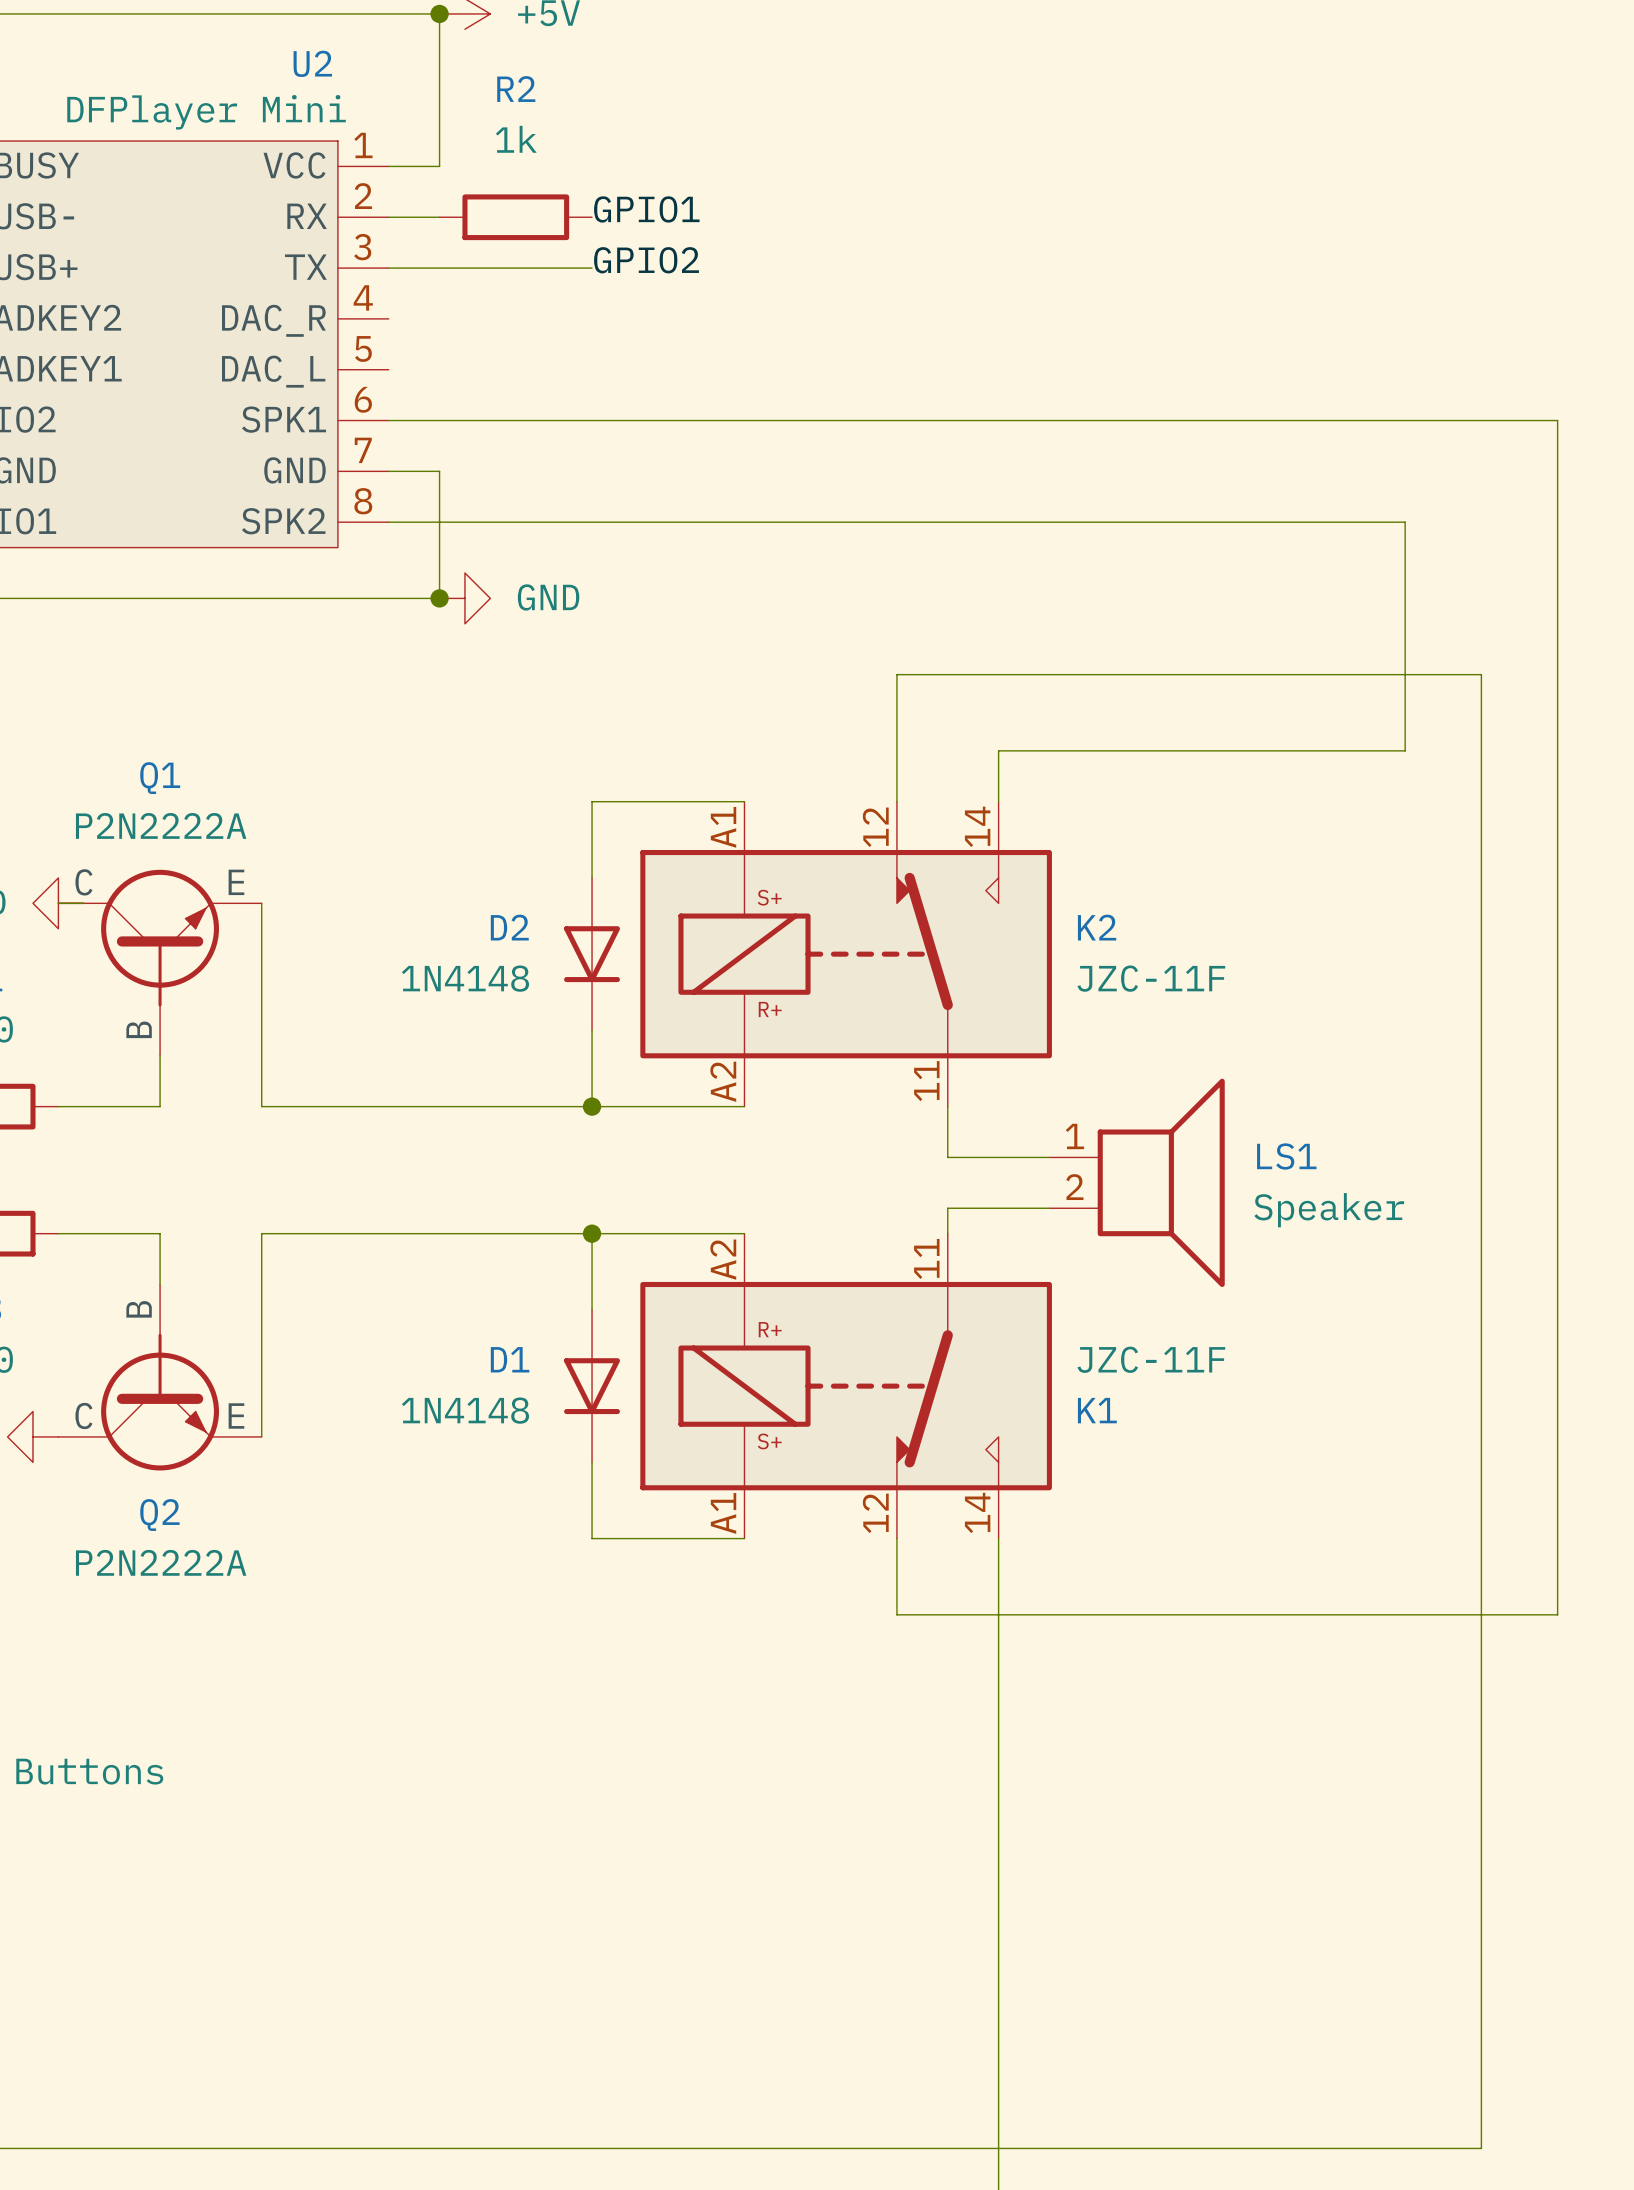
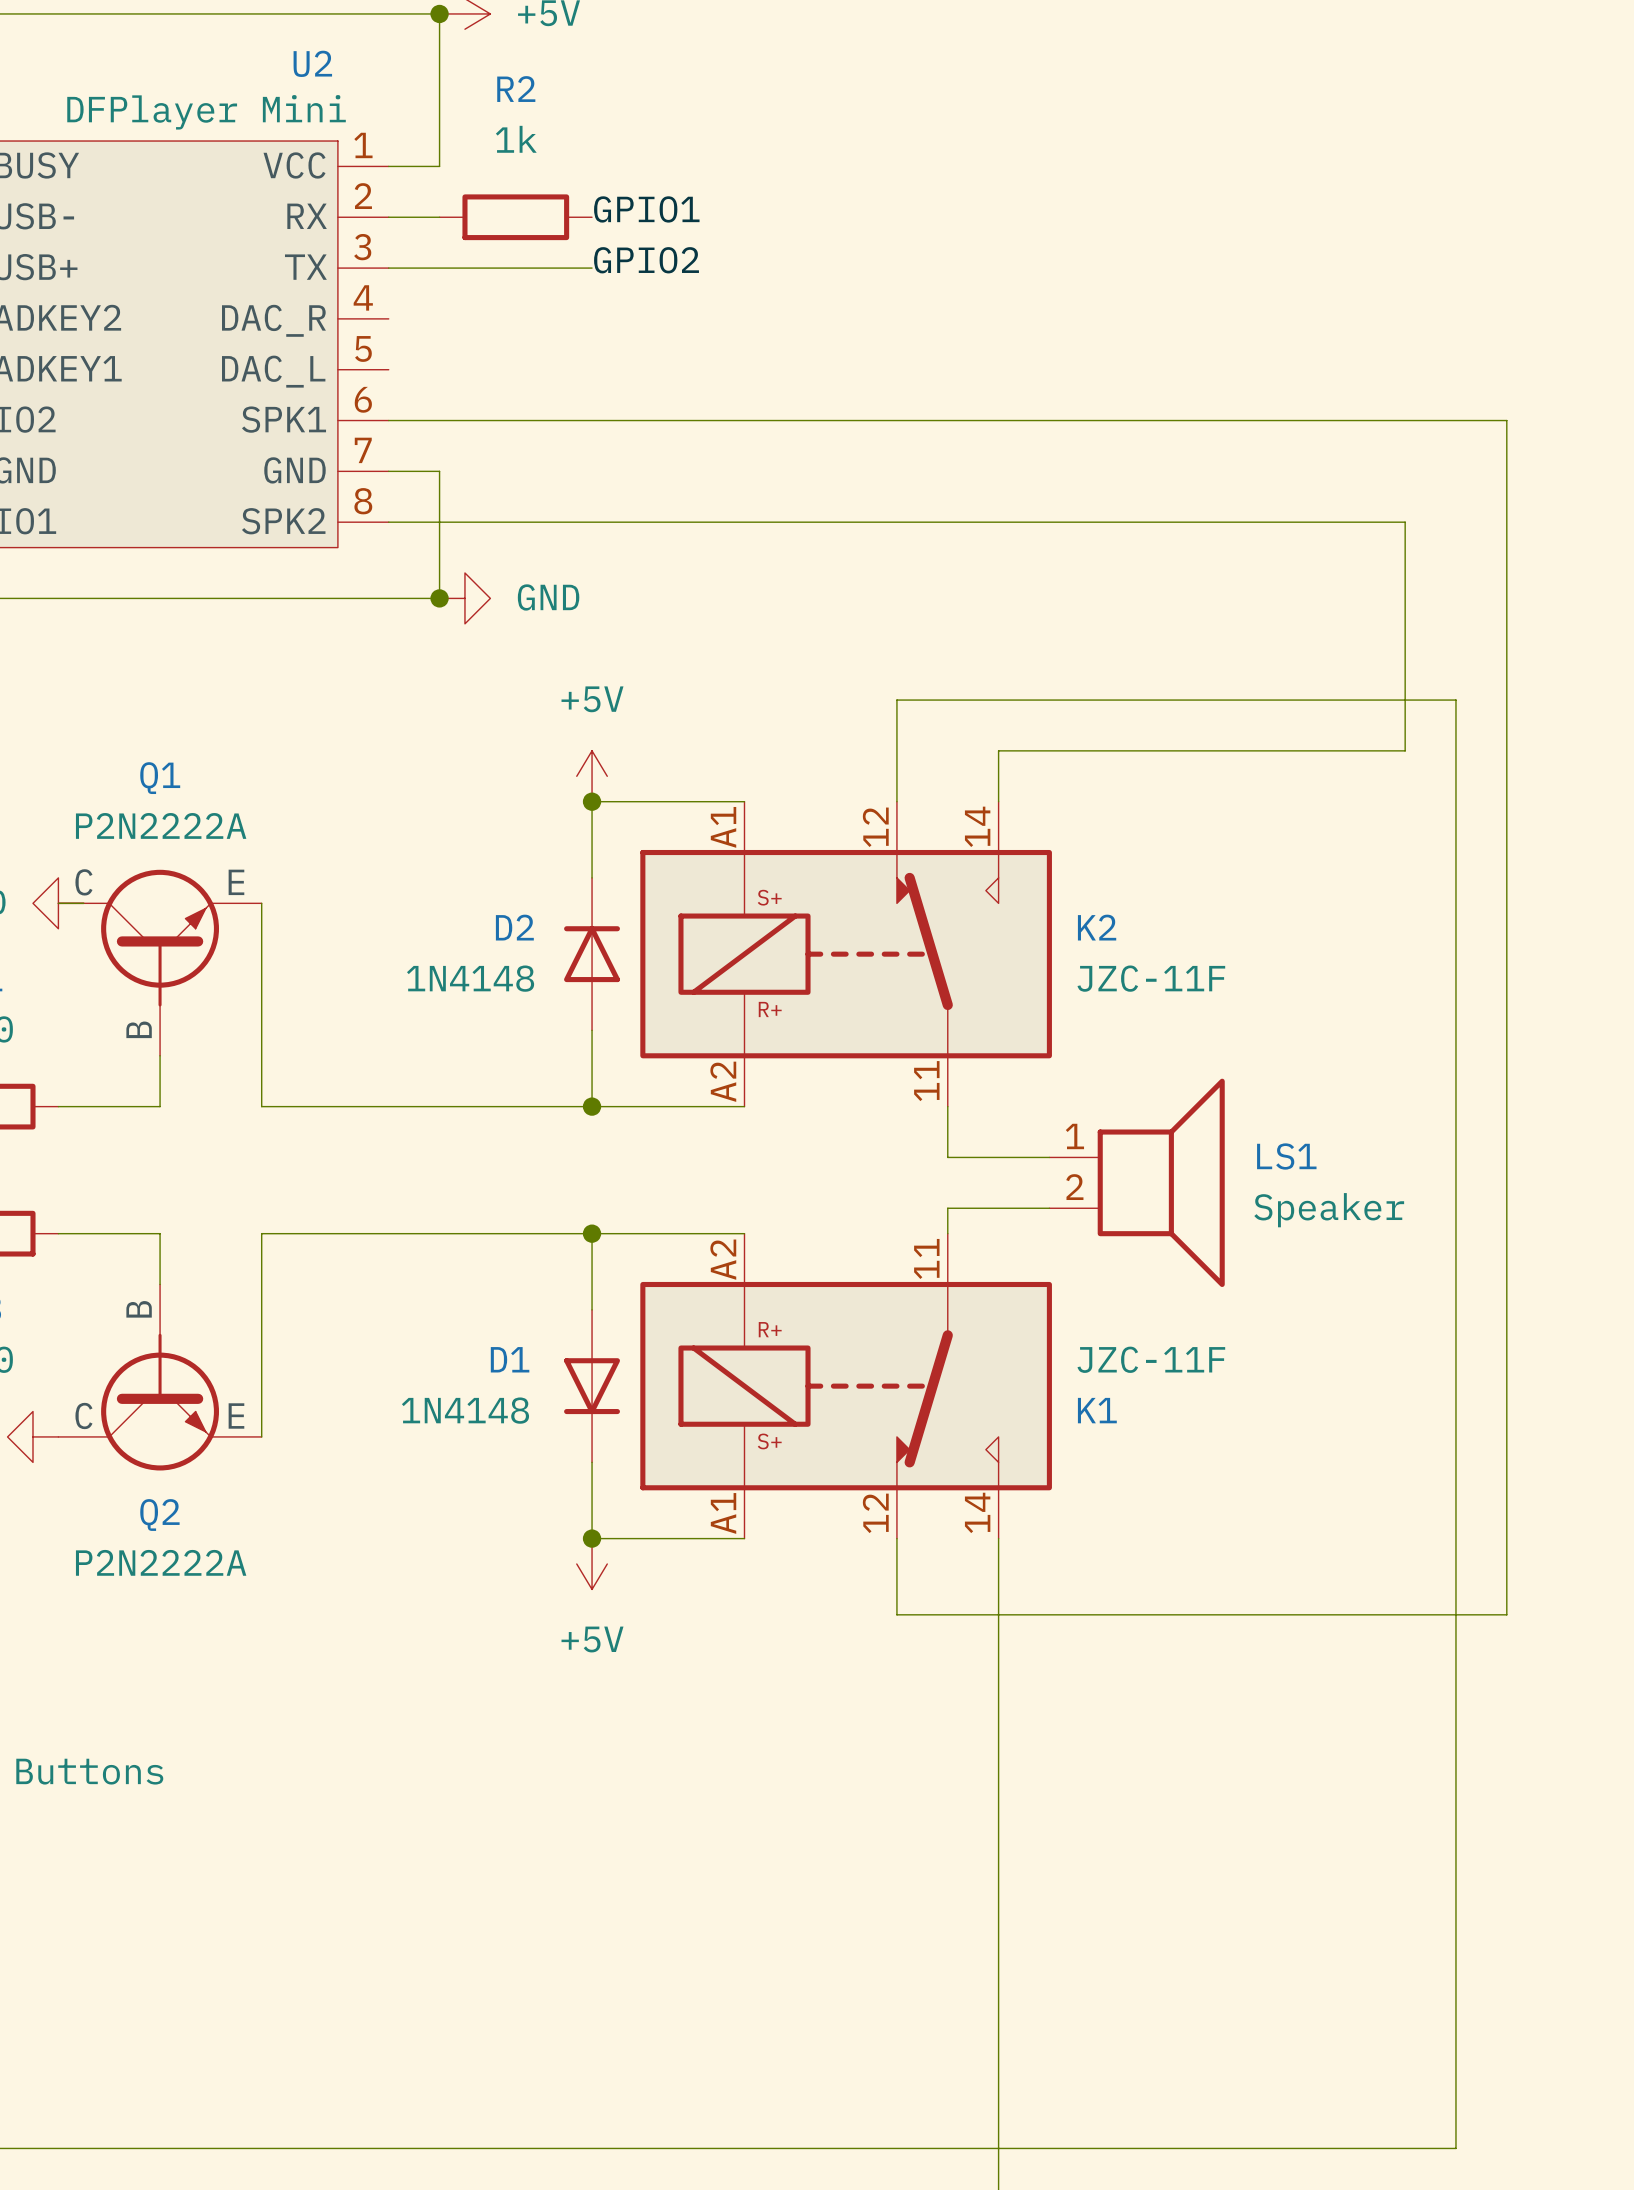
wire: (1506, 420) (1557, 420) (1557, 1614) (1506, 1614) -> (1506, 420) (1506, 1614)
wire: (896, 700) (896, 674) (1481, 674) (1481, 2148) (1455, 2148) -> (896, 700) (1455, 700) (1455, 2148)
power symbol: none -> +5V (592, 776)
junction: none -> (592, 801)
D2 rotation: 0° (592, 954) -> 180° (592, 954)
junction: none -> (592, 1538)
power symbol: none -> +5V (592, 1564)

